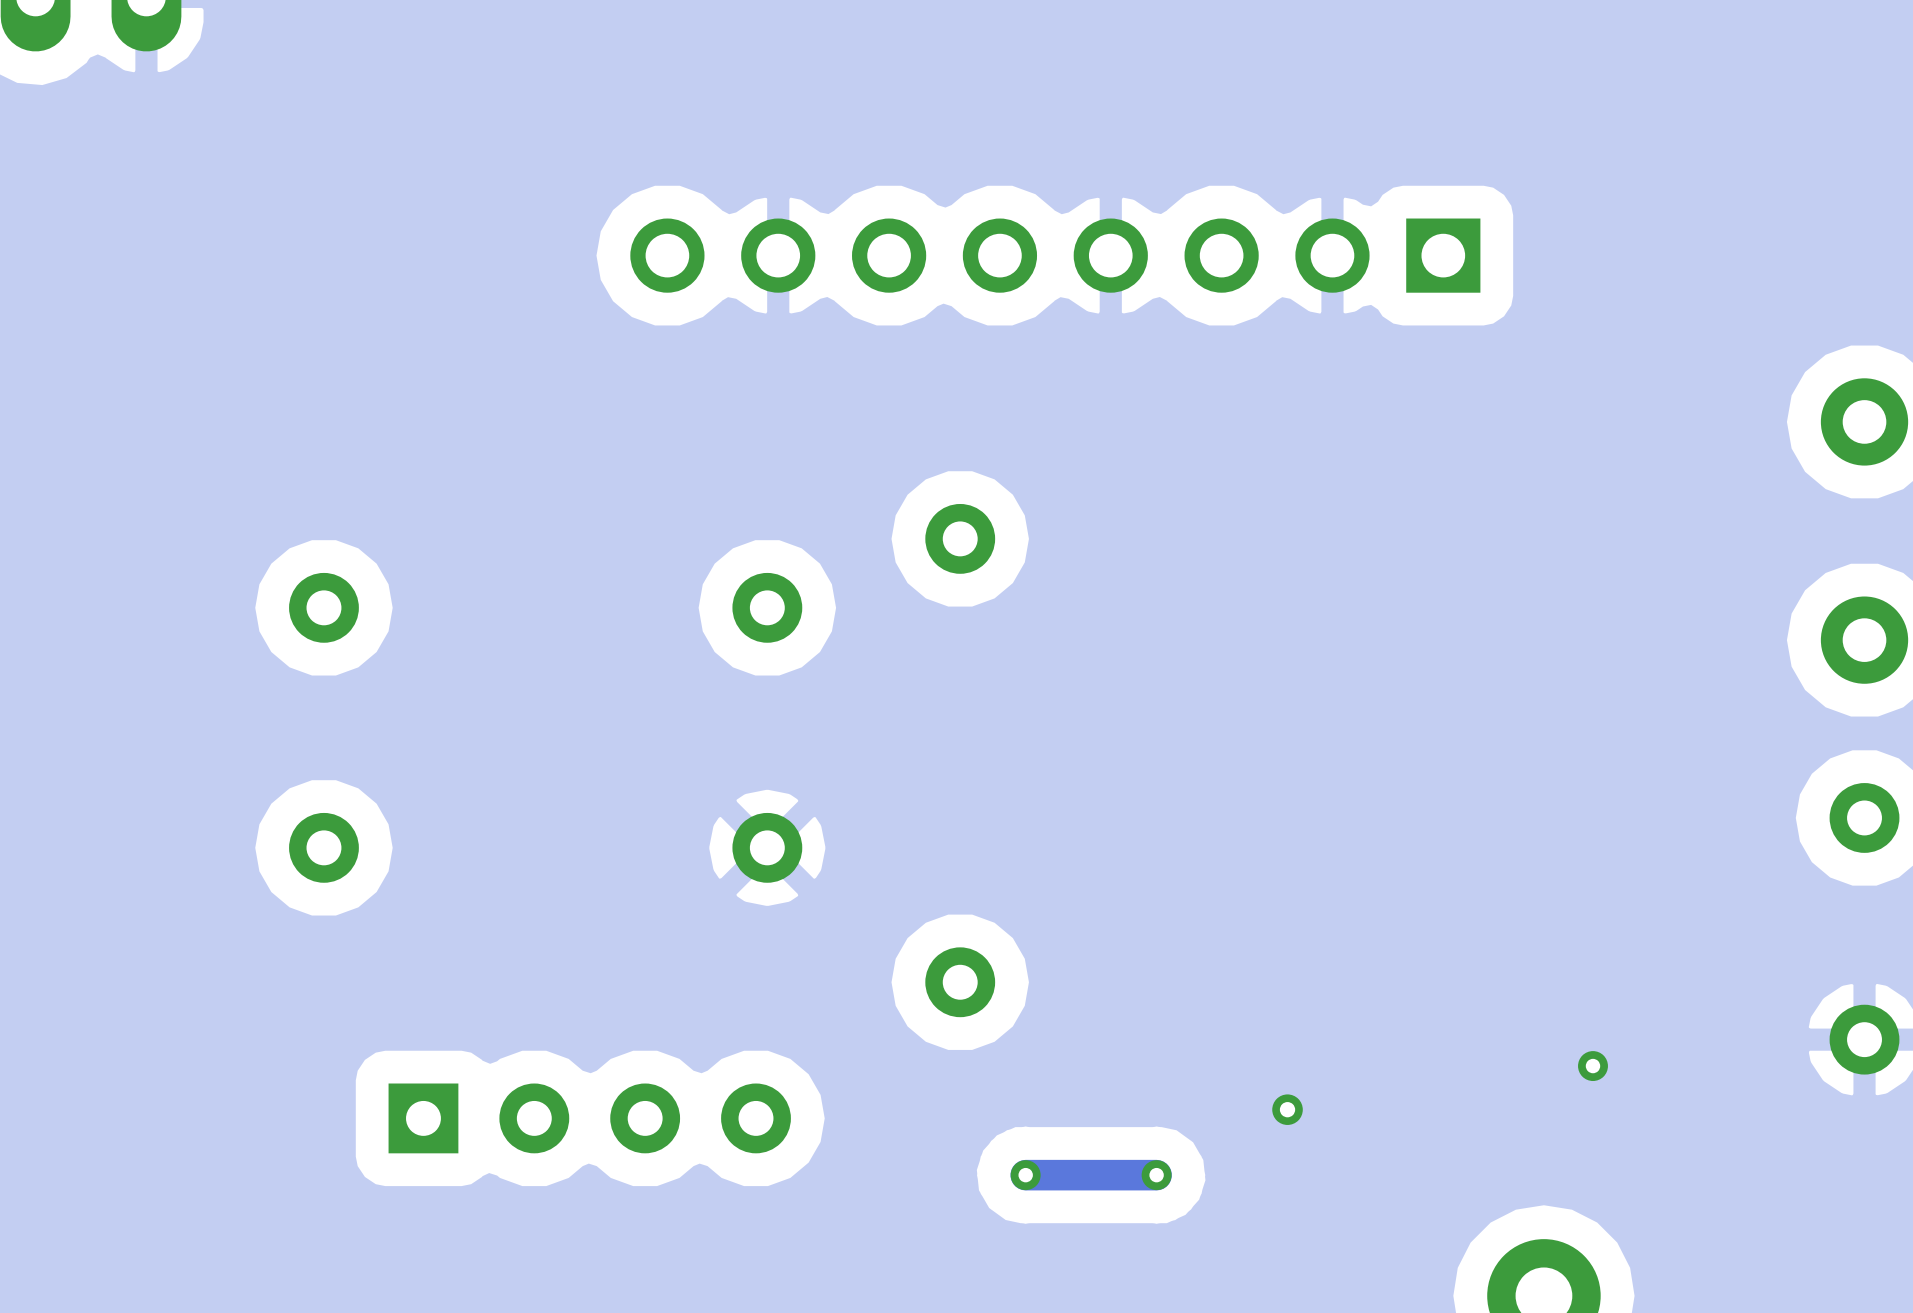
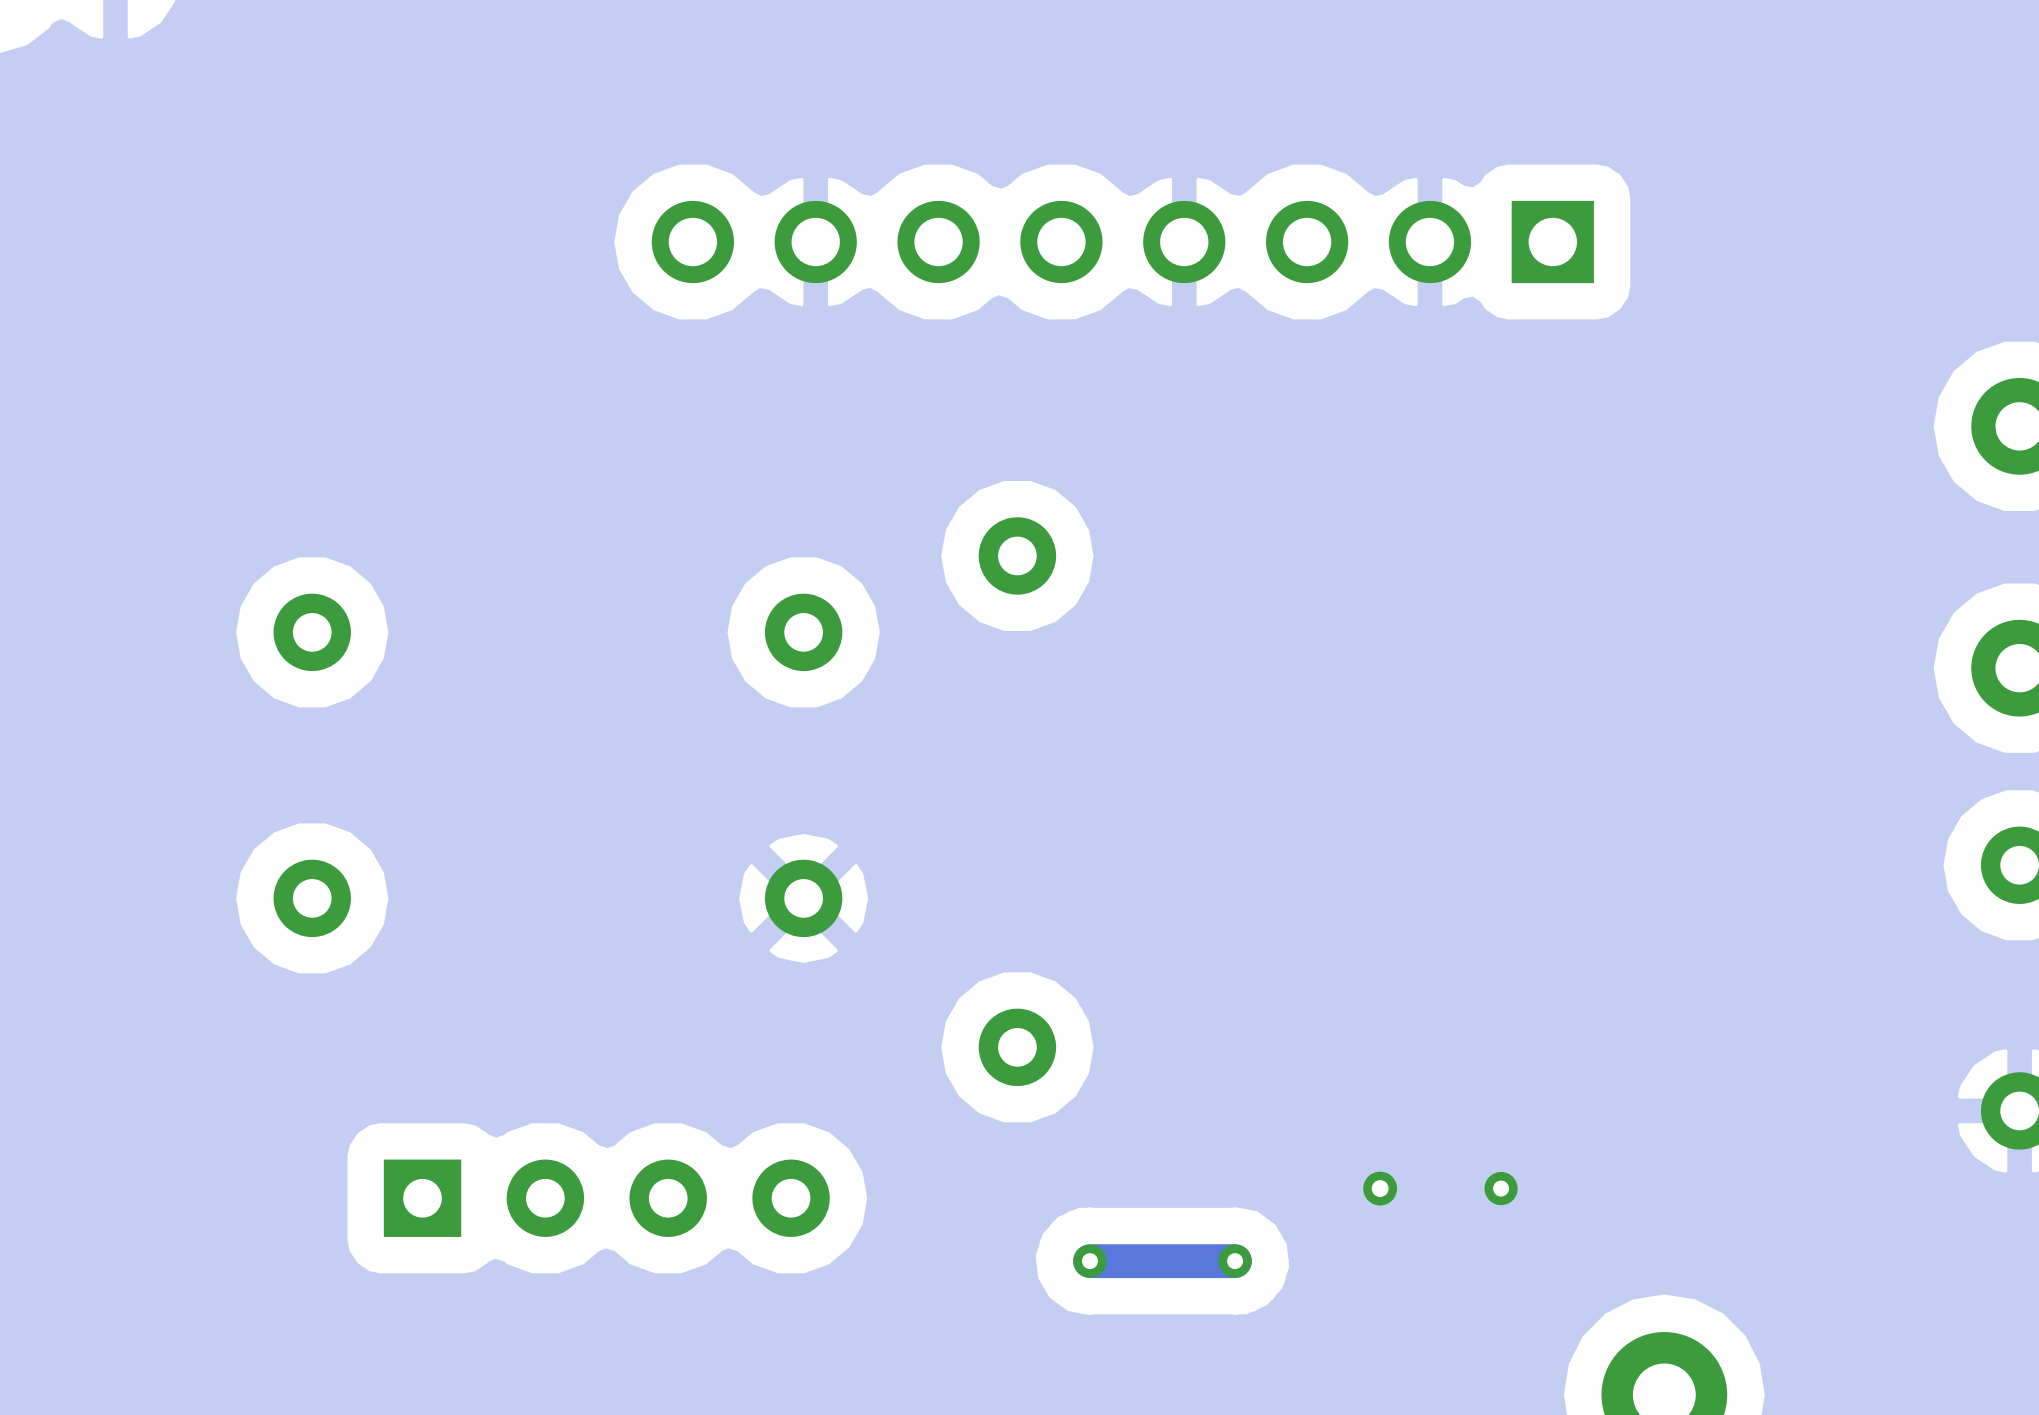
via position: (1592, 1066) -> (1501, 1188)

